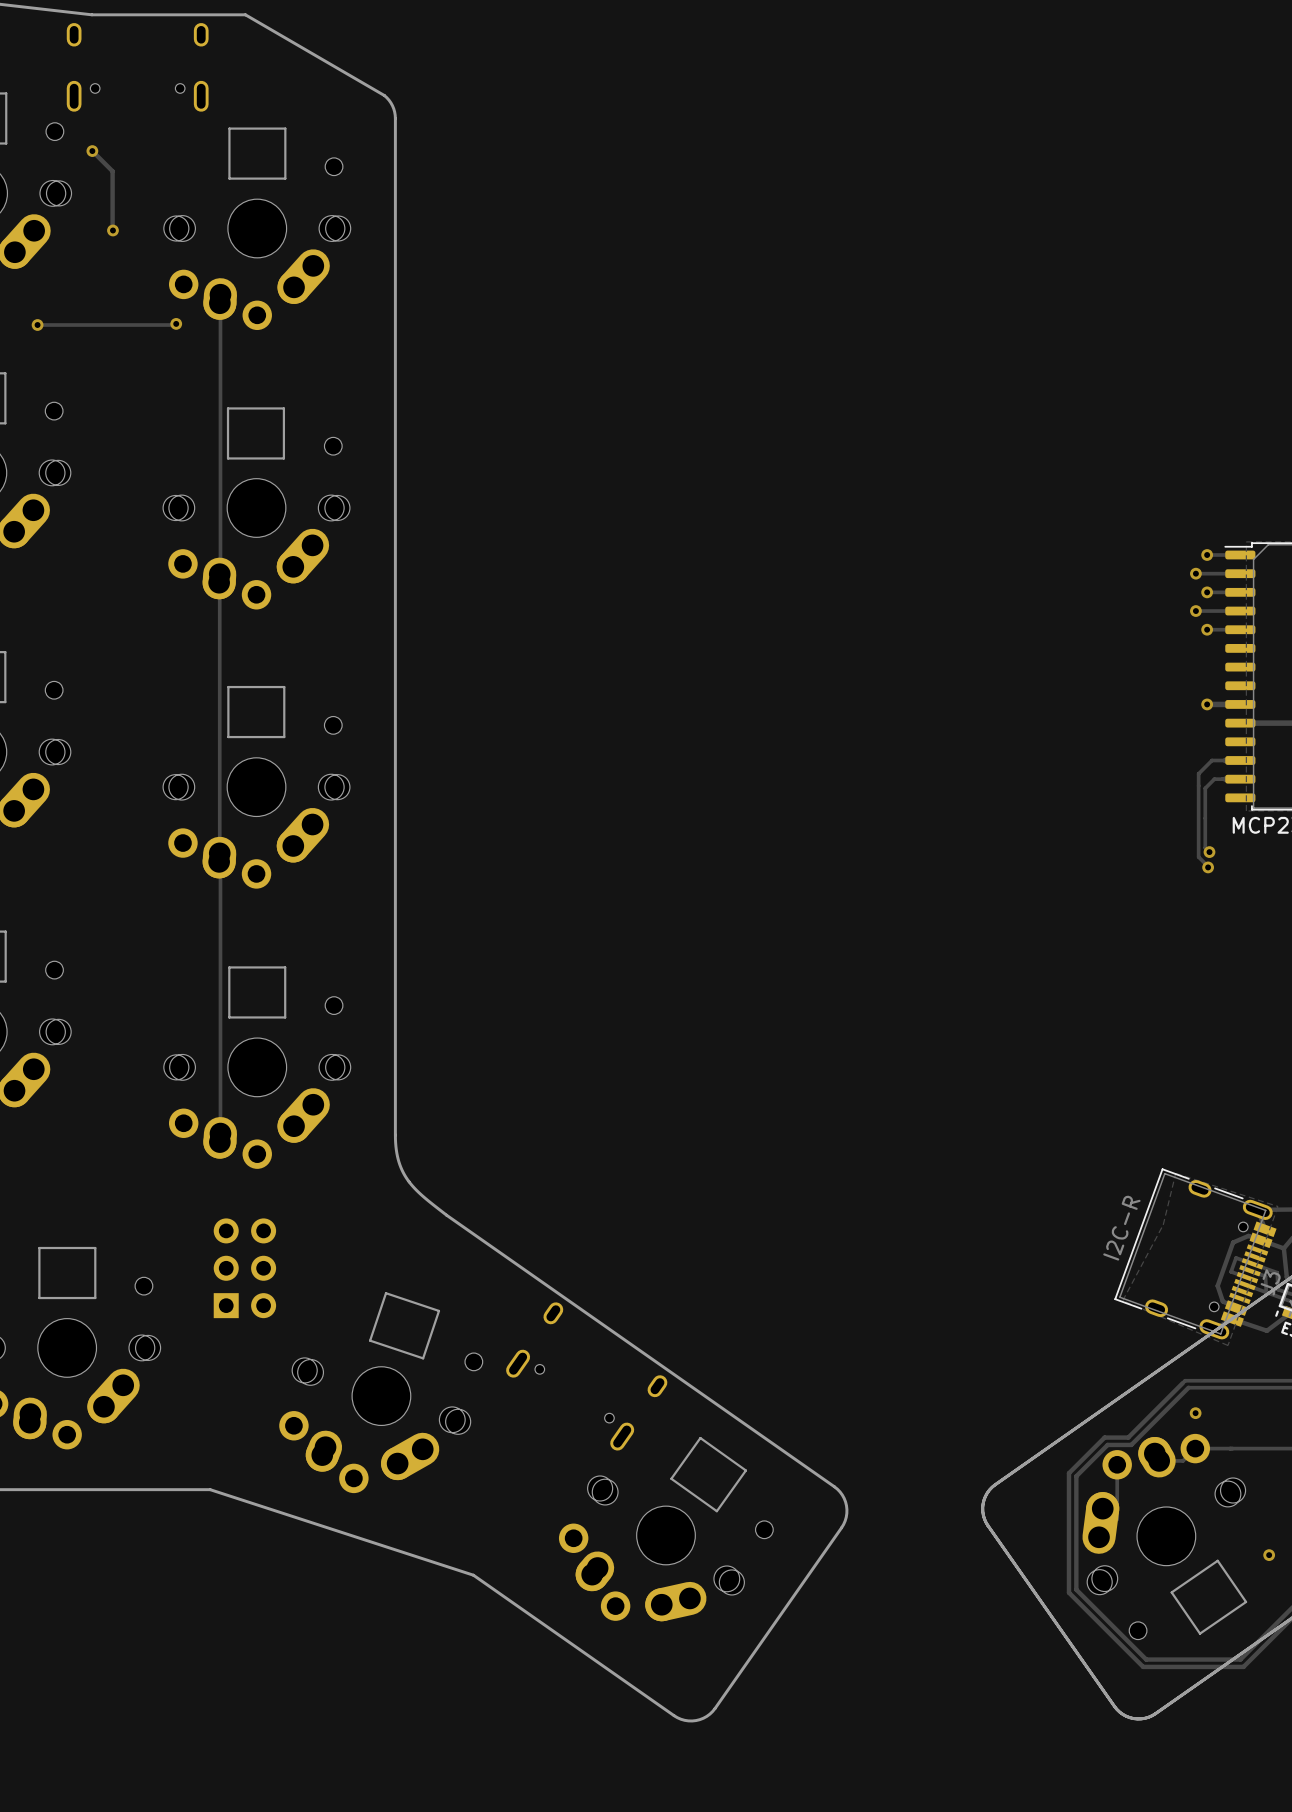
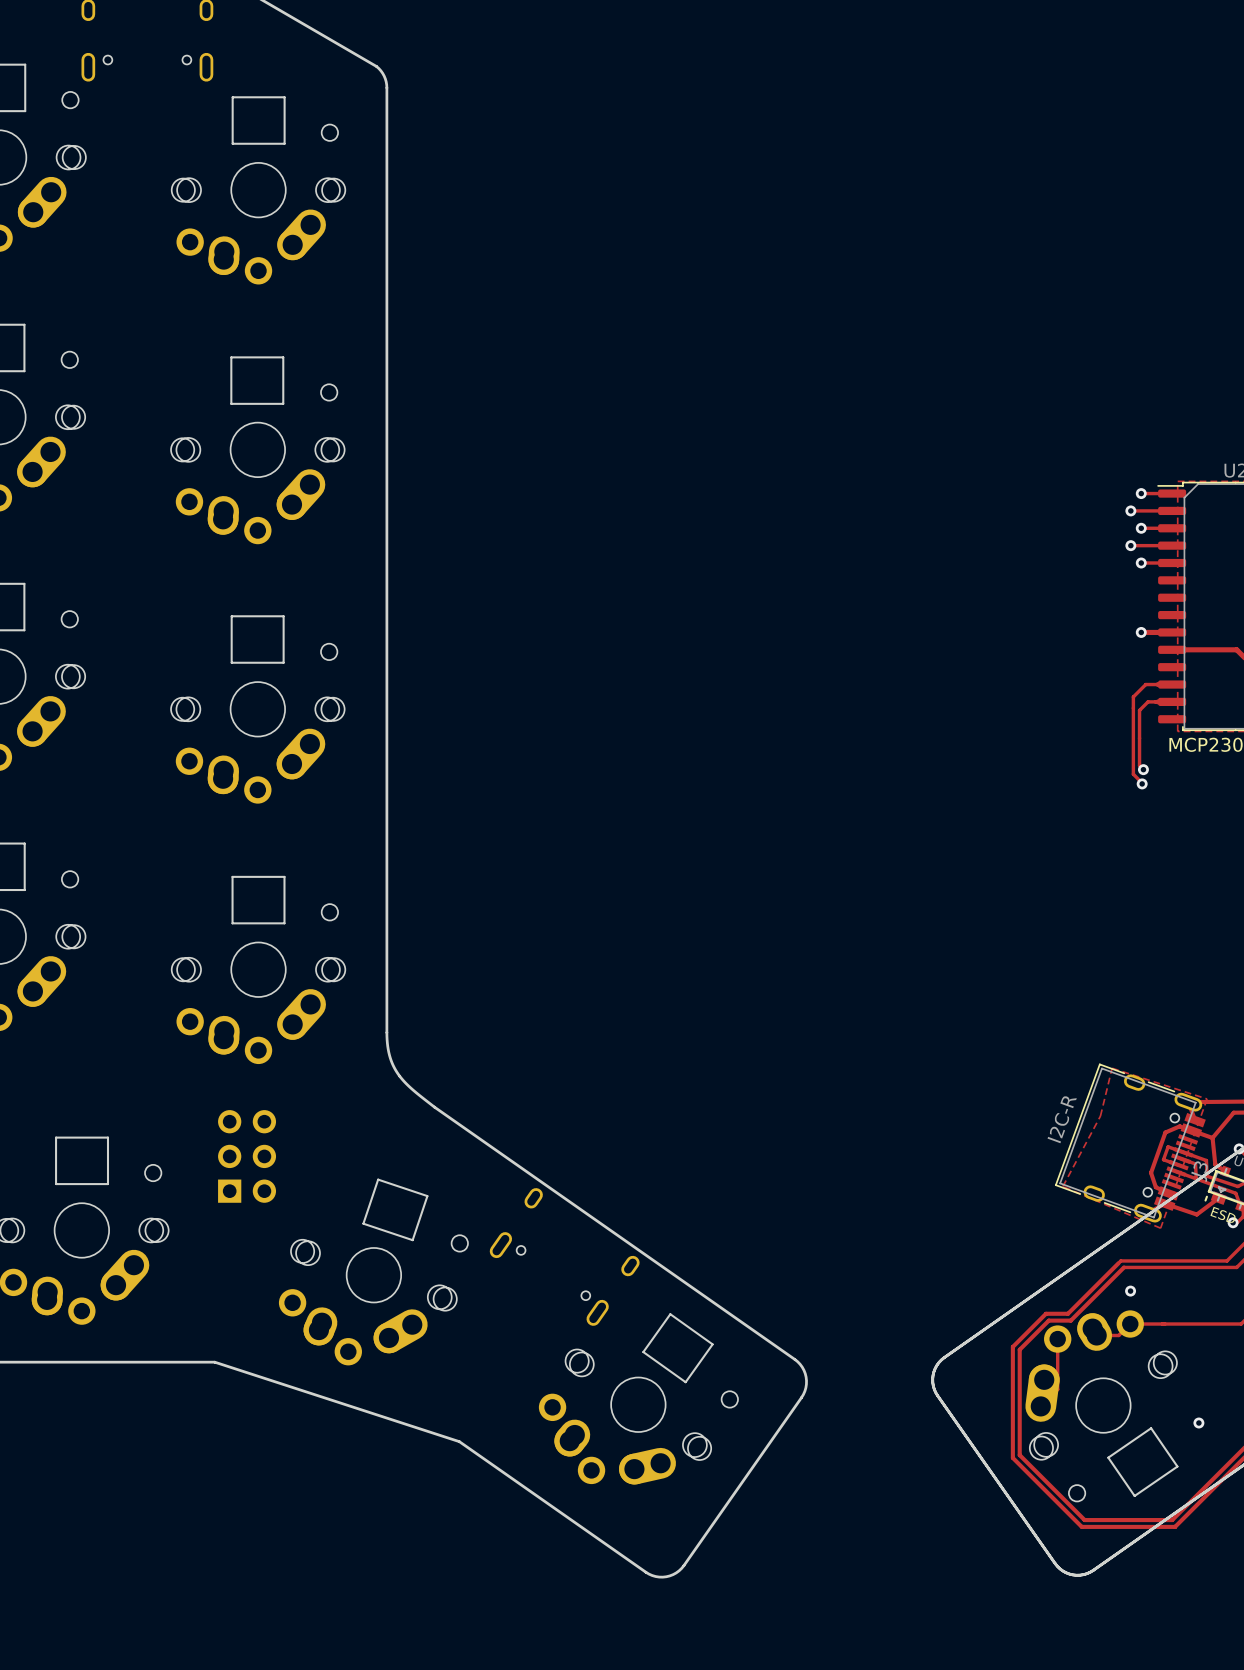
track: (92, 151) (112, 171) (112, 230) -> none
via: (92, 151) -> none
via: (112, 230) -> none
track: (220, 294) (220, 1133) -> none
track: (176, 323) (37, 325) -> none
via: (176, 323) -> none
via: (37, 325) -> none

